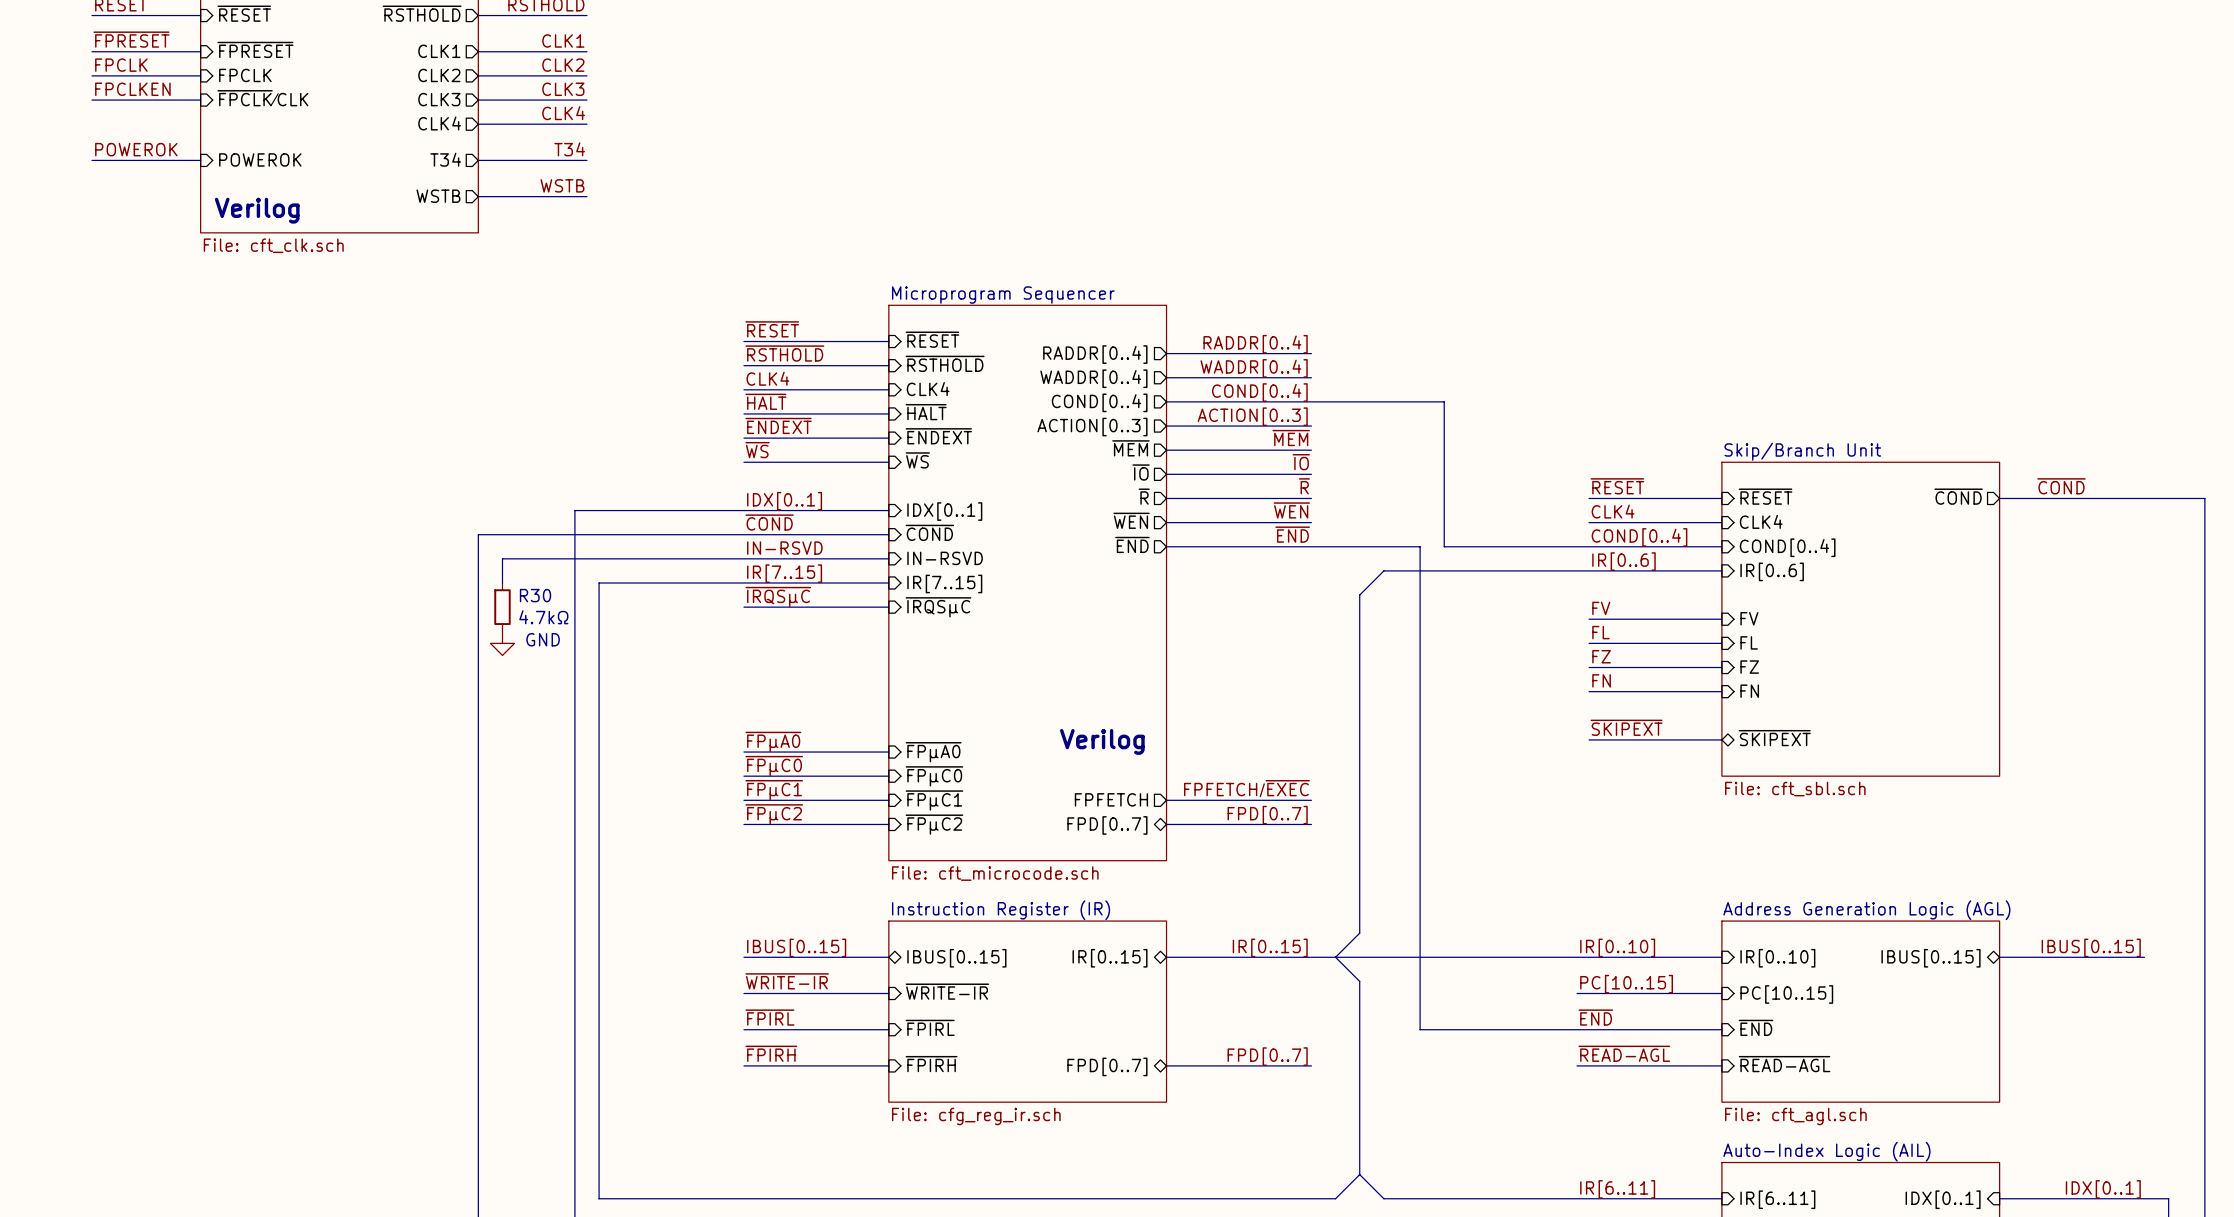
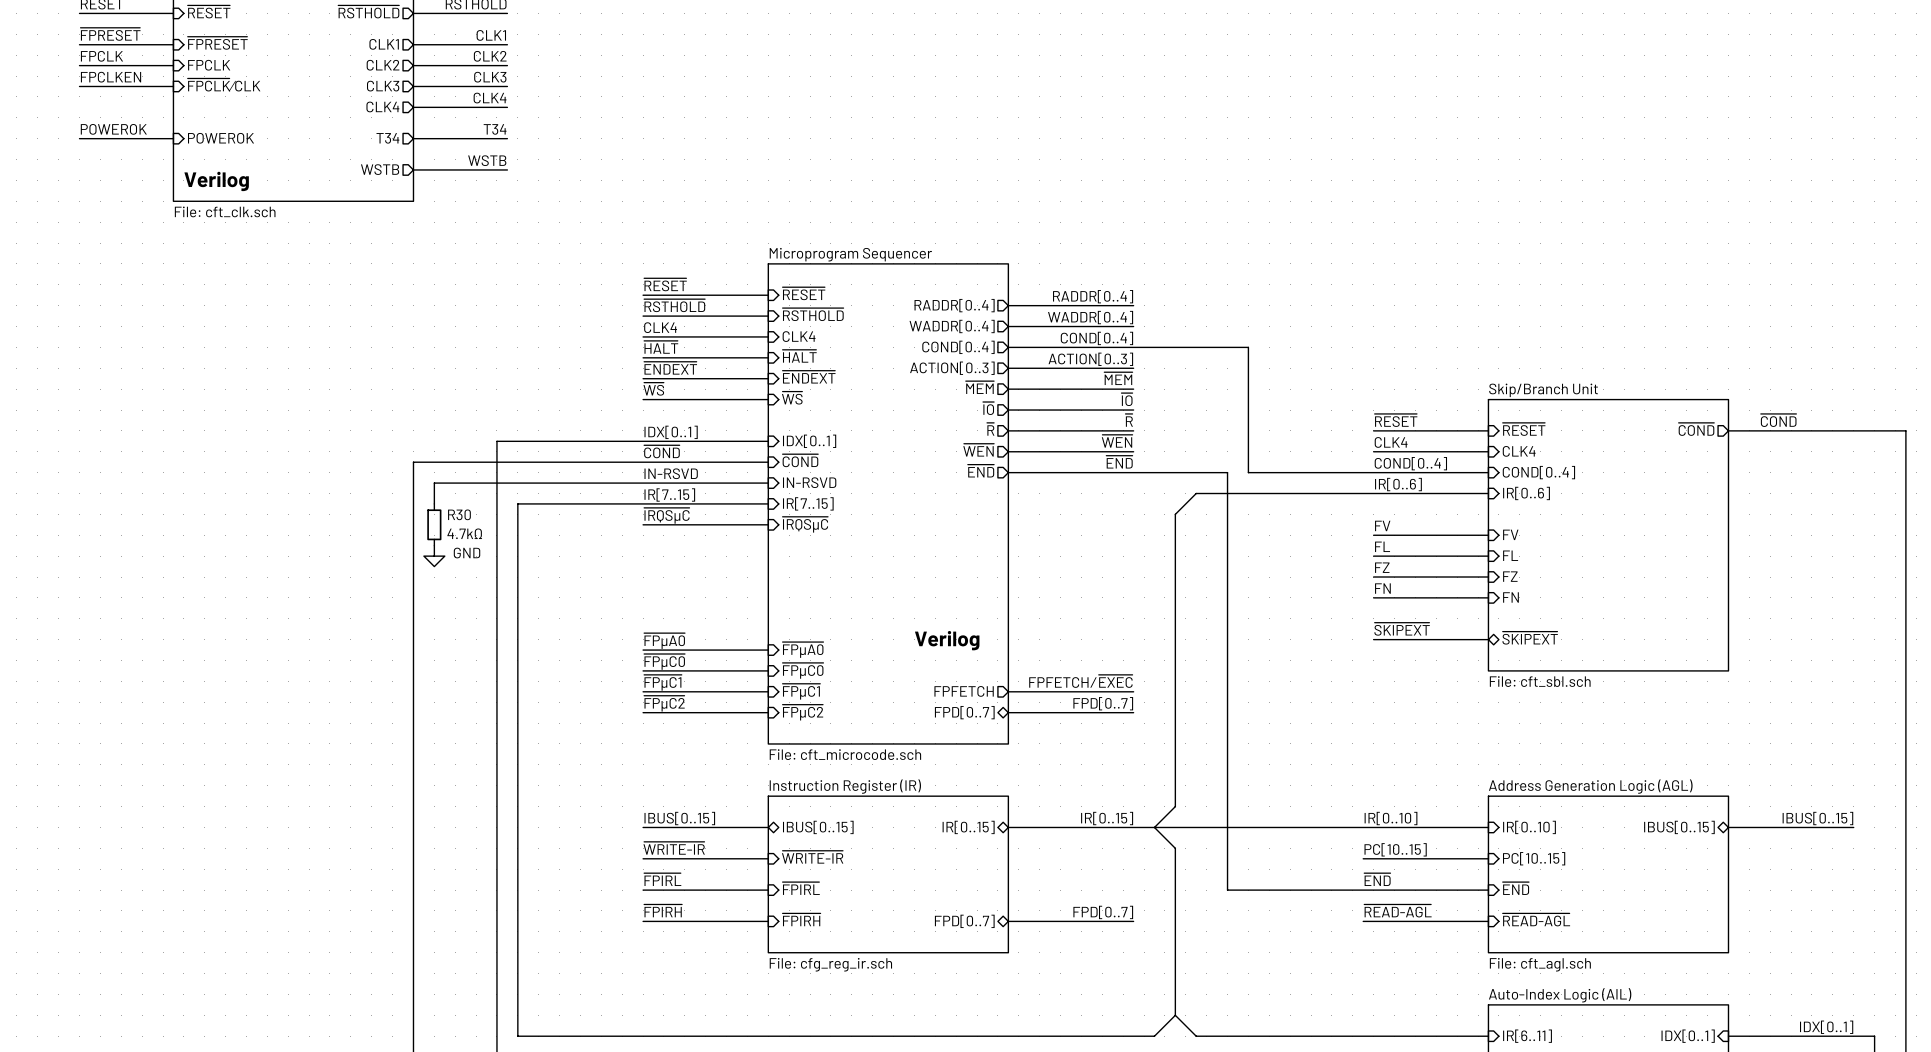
label: IR[6..11] (1617, 1189) -> none

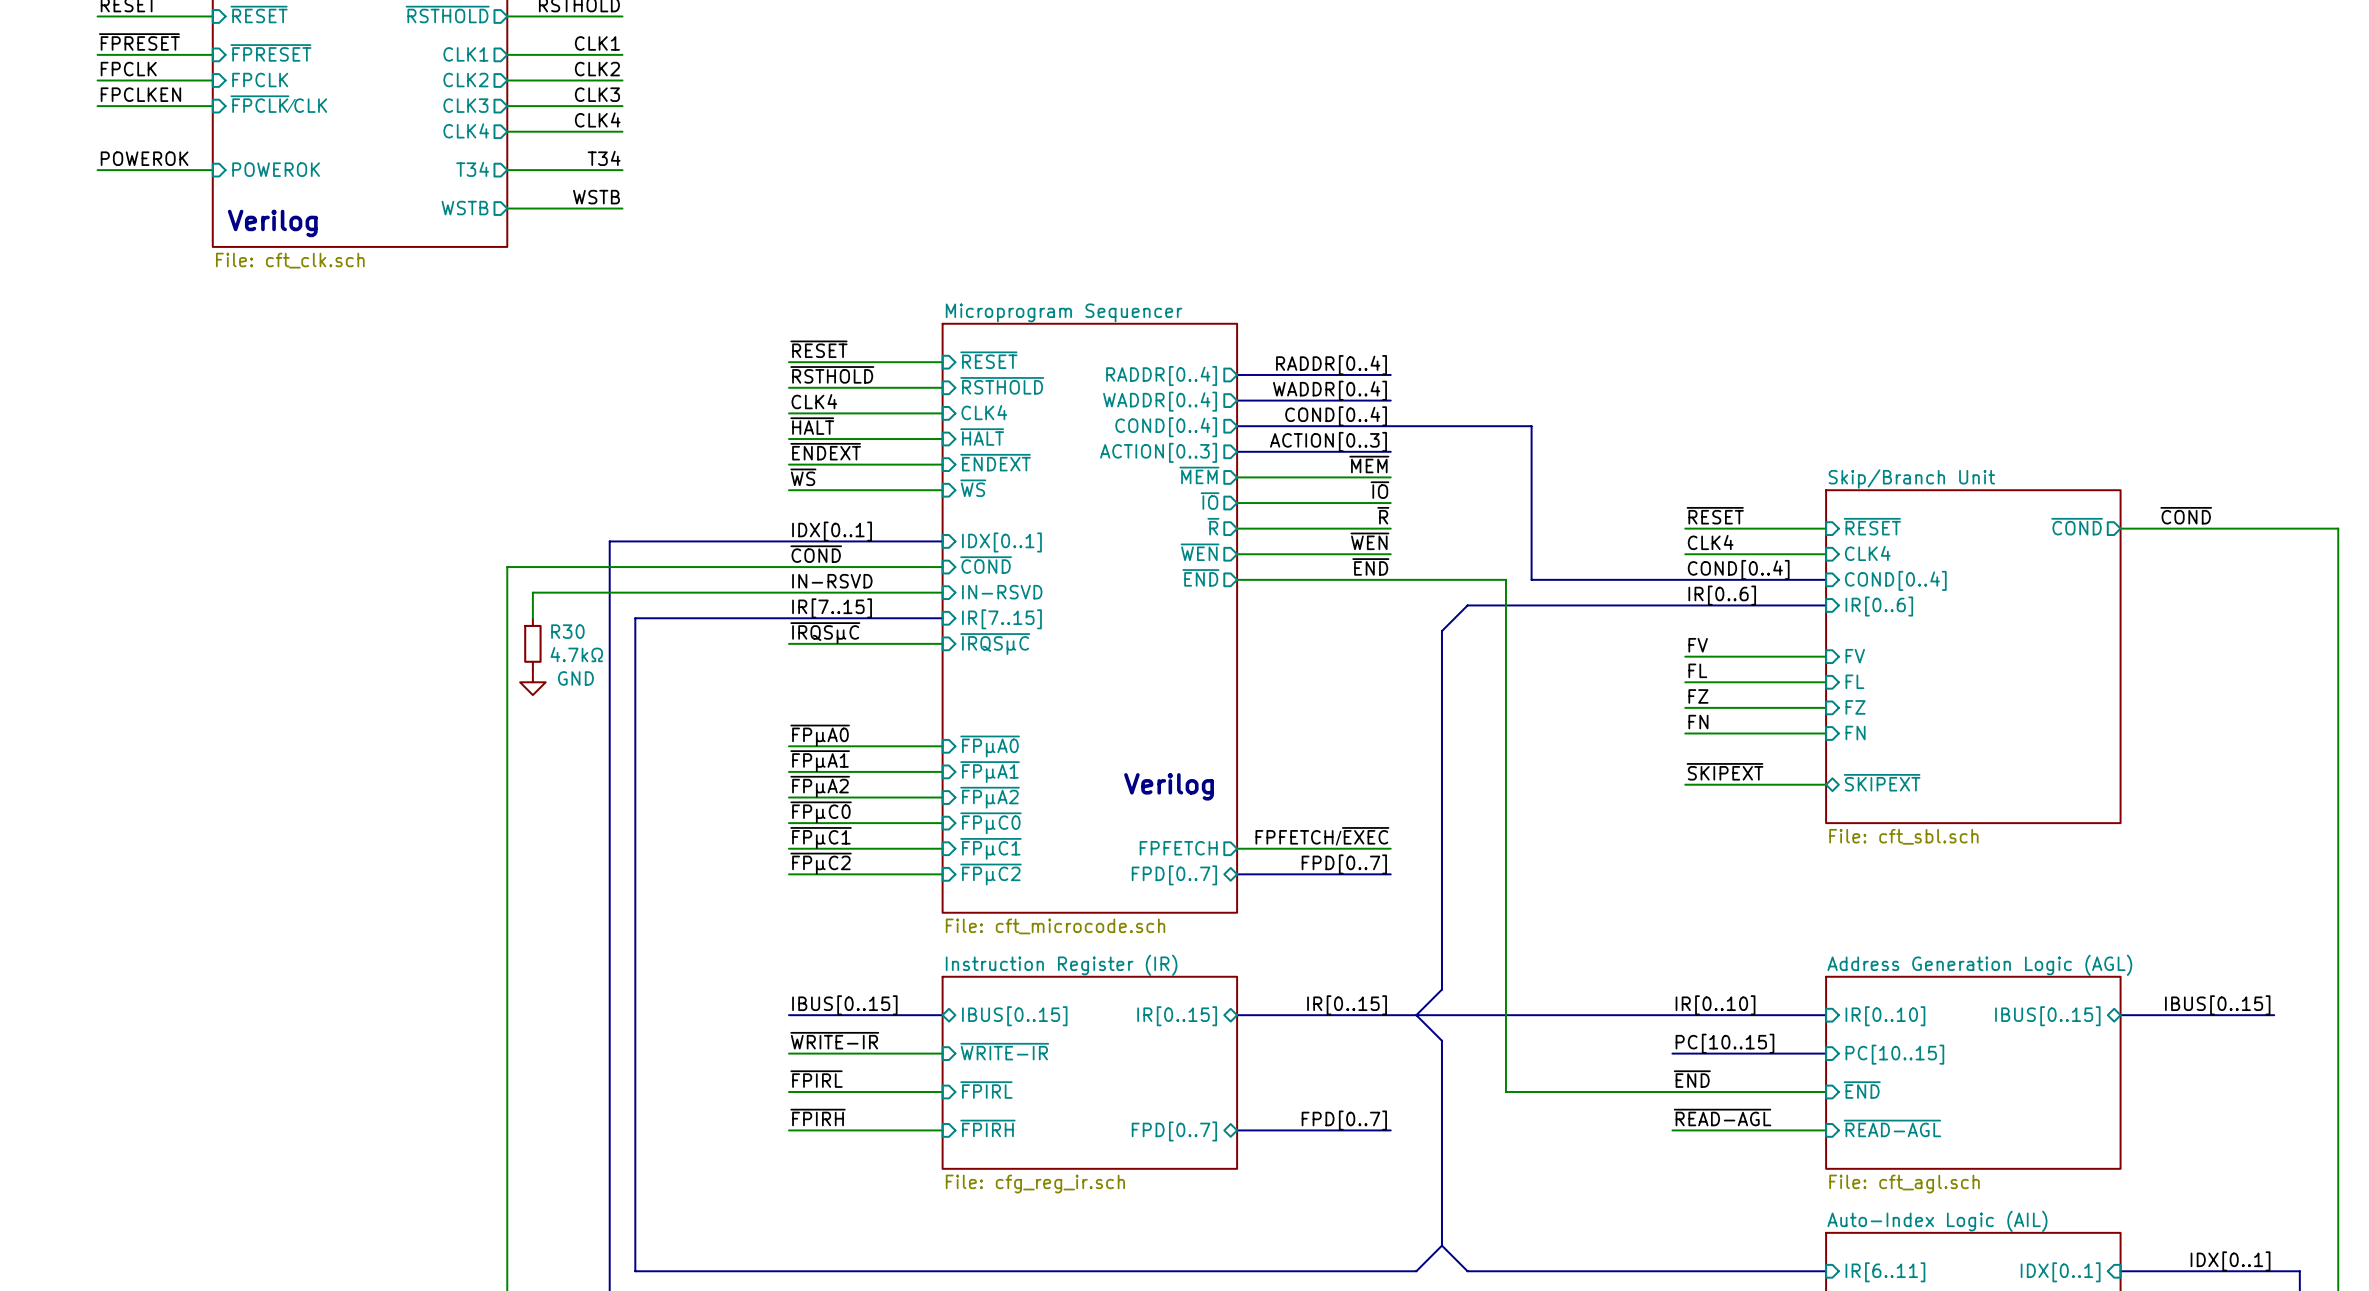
label: none -> ~{FPµA0} (820, 735)
wire: none -> (788, 746) (942, 746)
sheet pin: none -> ~{FPµA0} (990, 746)
label: none -> ~{FPµA1} (820, 761)
wire: none -> (788, 771) (942, 771)
sheet pin: none -> ~{FPµA1} (990, 772)
label: ~{FPµA0} (664, 641) -> ~{FPµA2} (820, 786)
sheet pin: ~{FPµA0} (803, 649) -> ~{FPµA2} (990, 797)

